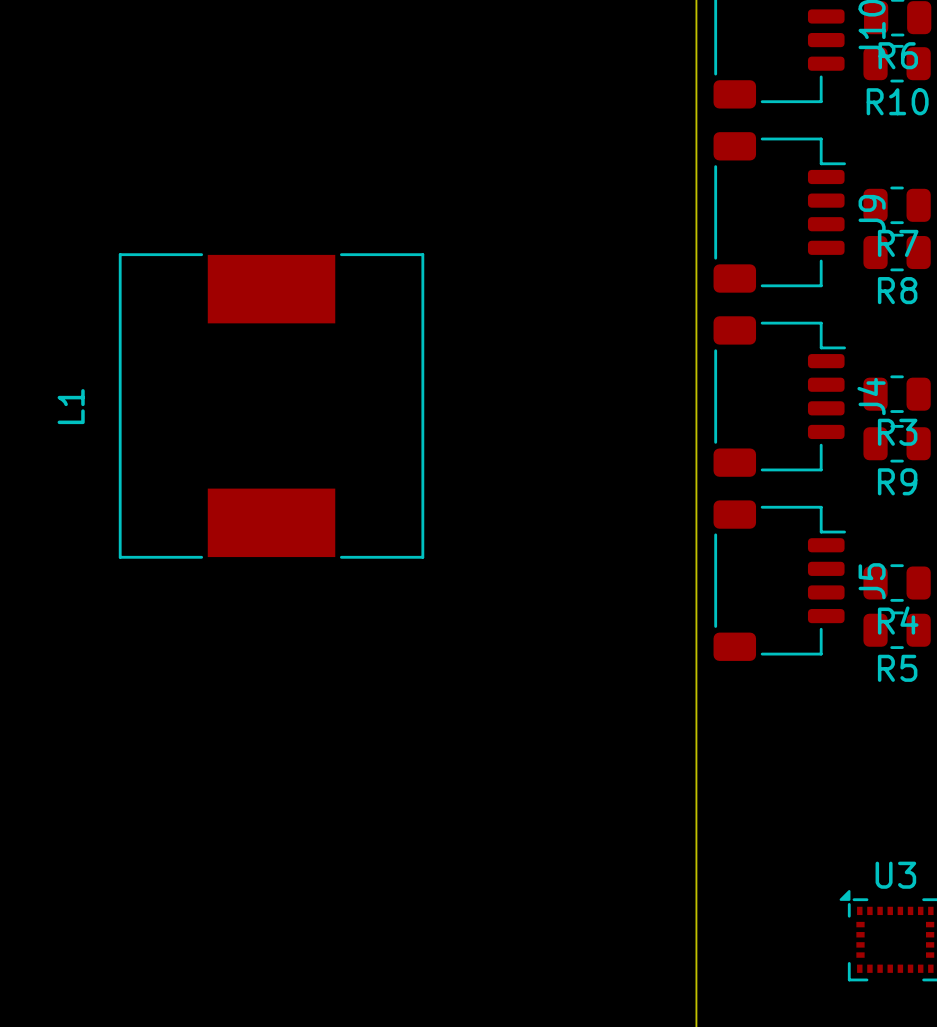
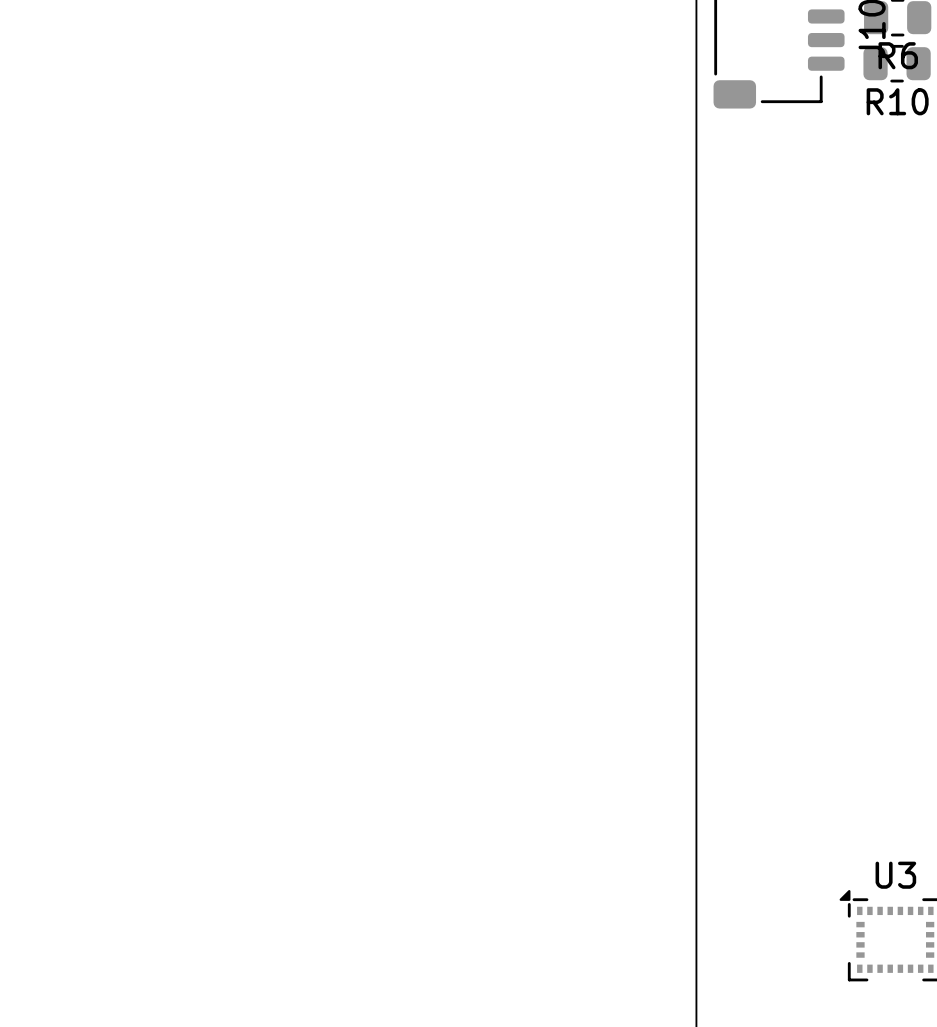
R7: (897, 205) -> none
J9: (779, 212) -> none
R8: (897, 252) -> none
R3: (897, 394) -> none
J4: (779, 396) -> none
L1: (271, 405) -> none
R9: (897, 443) -> none
J5: (779, 580) -> none
R4: (897, 583) -> none
R5: (897, 630) -> none

